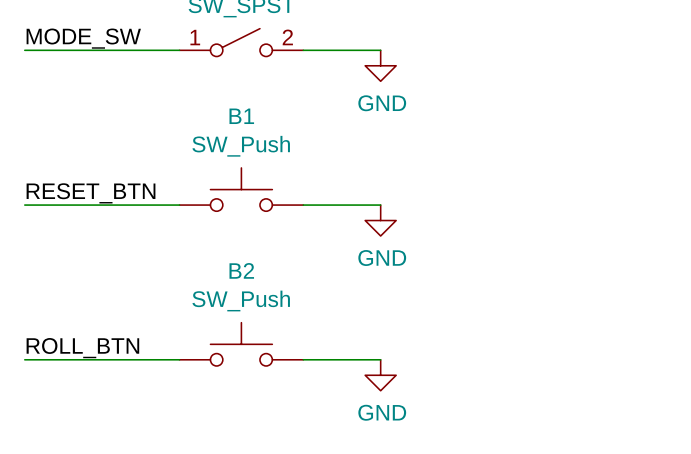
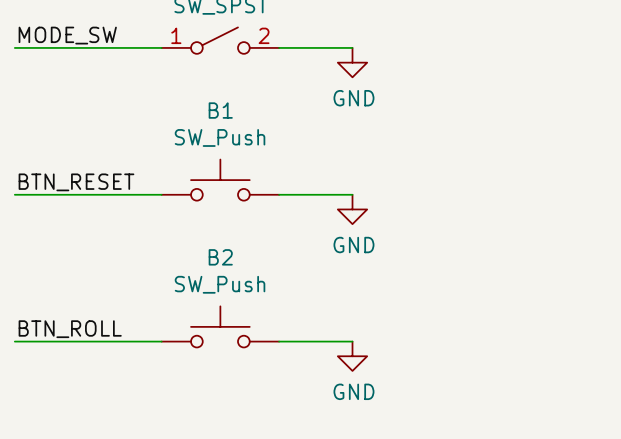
label: RESET_BTN (91, 193) -> BTN_RESET (76, 182)
label: ROLL_BTN (82, 348) -> BTN_ROLL (70, 329)

